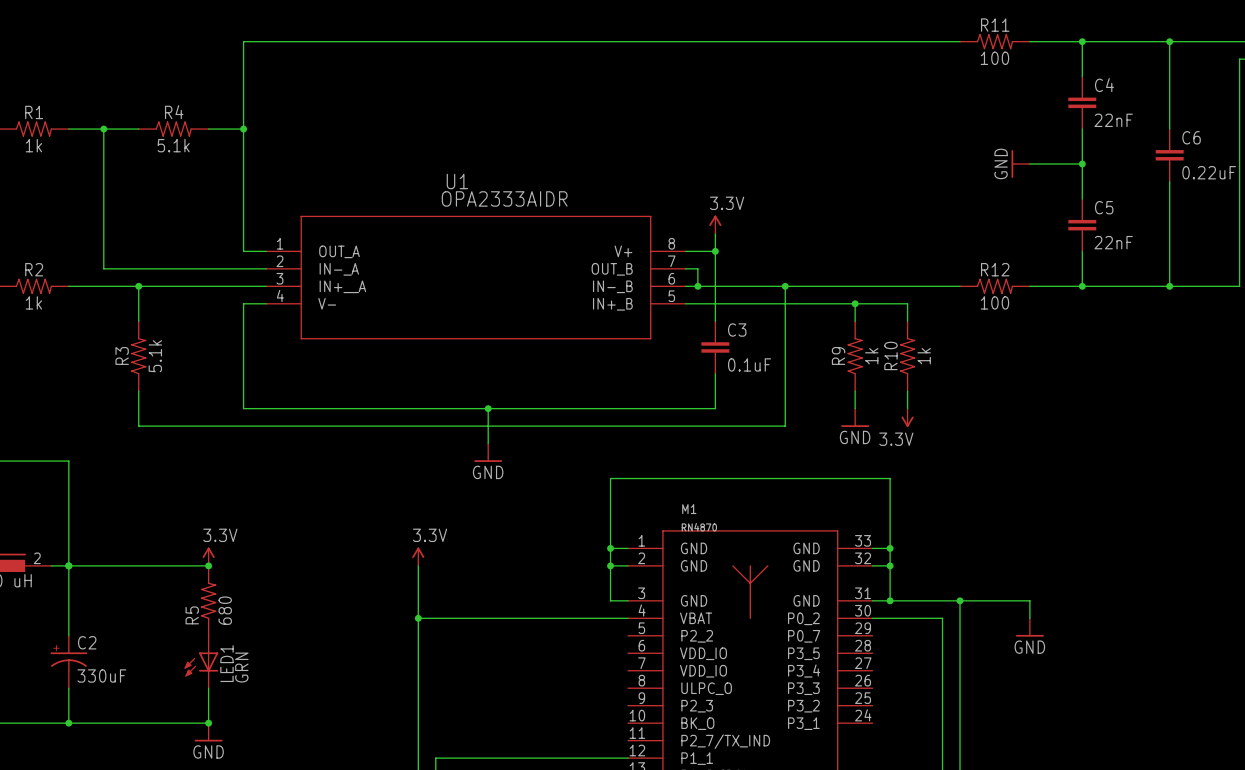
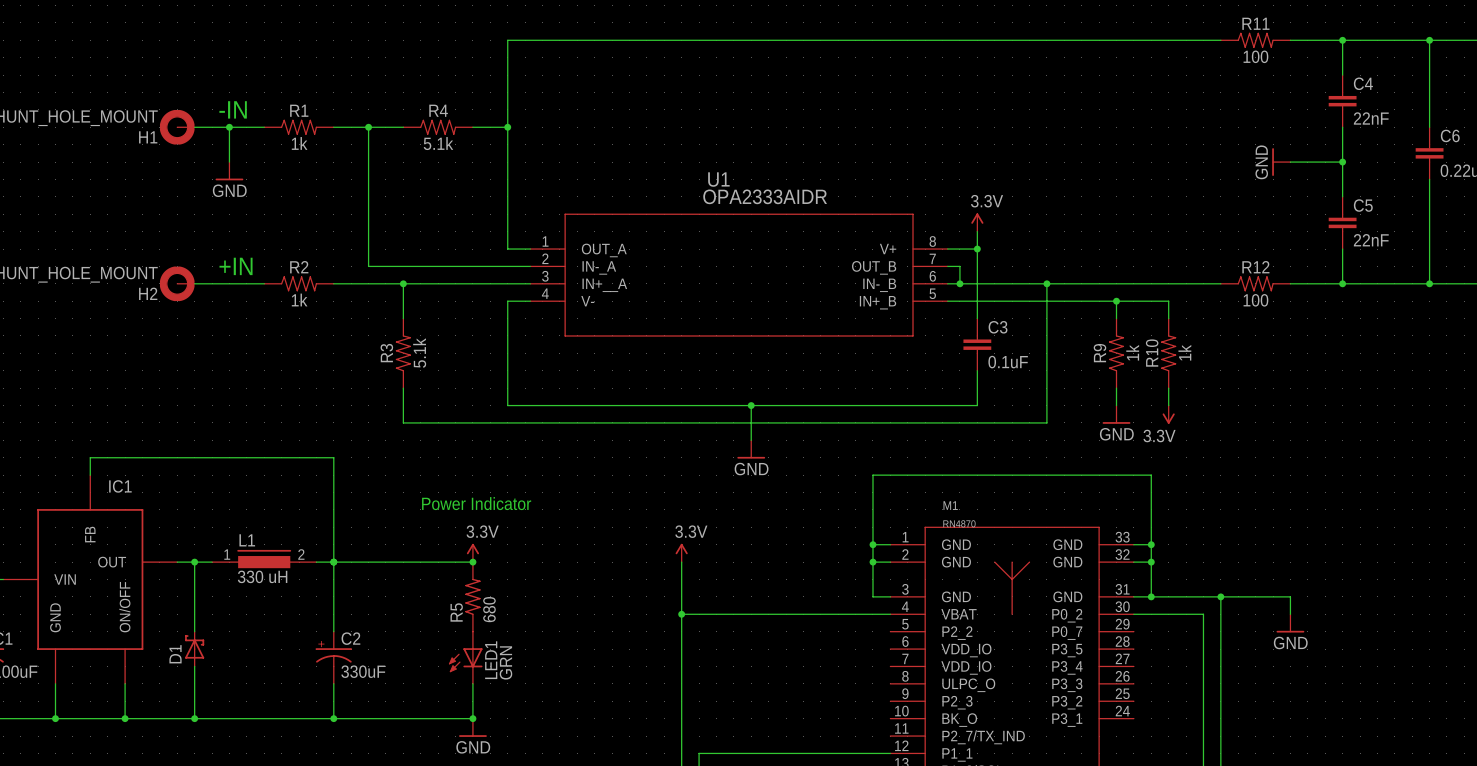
text: none -> Power Indicator (476, 503)

